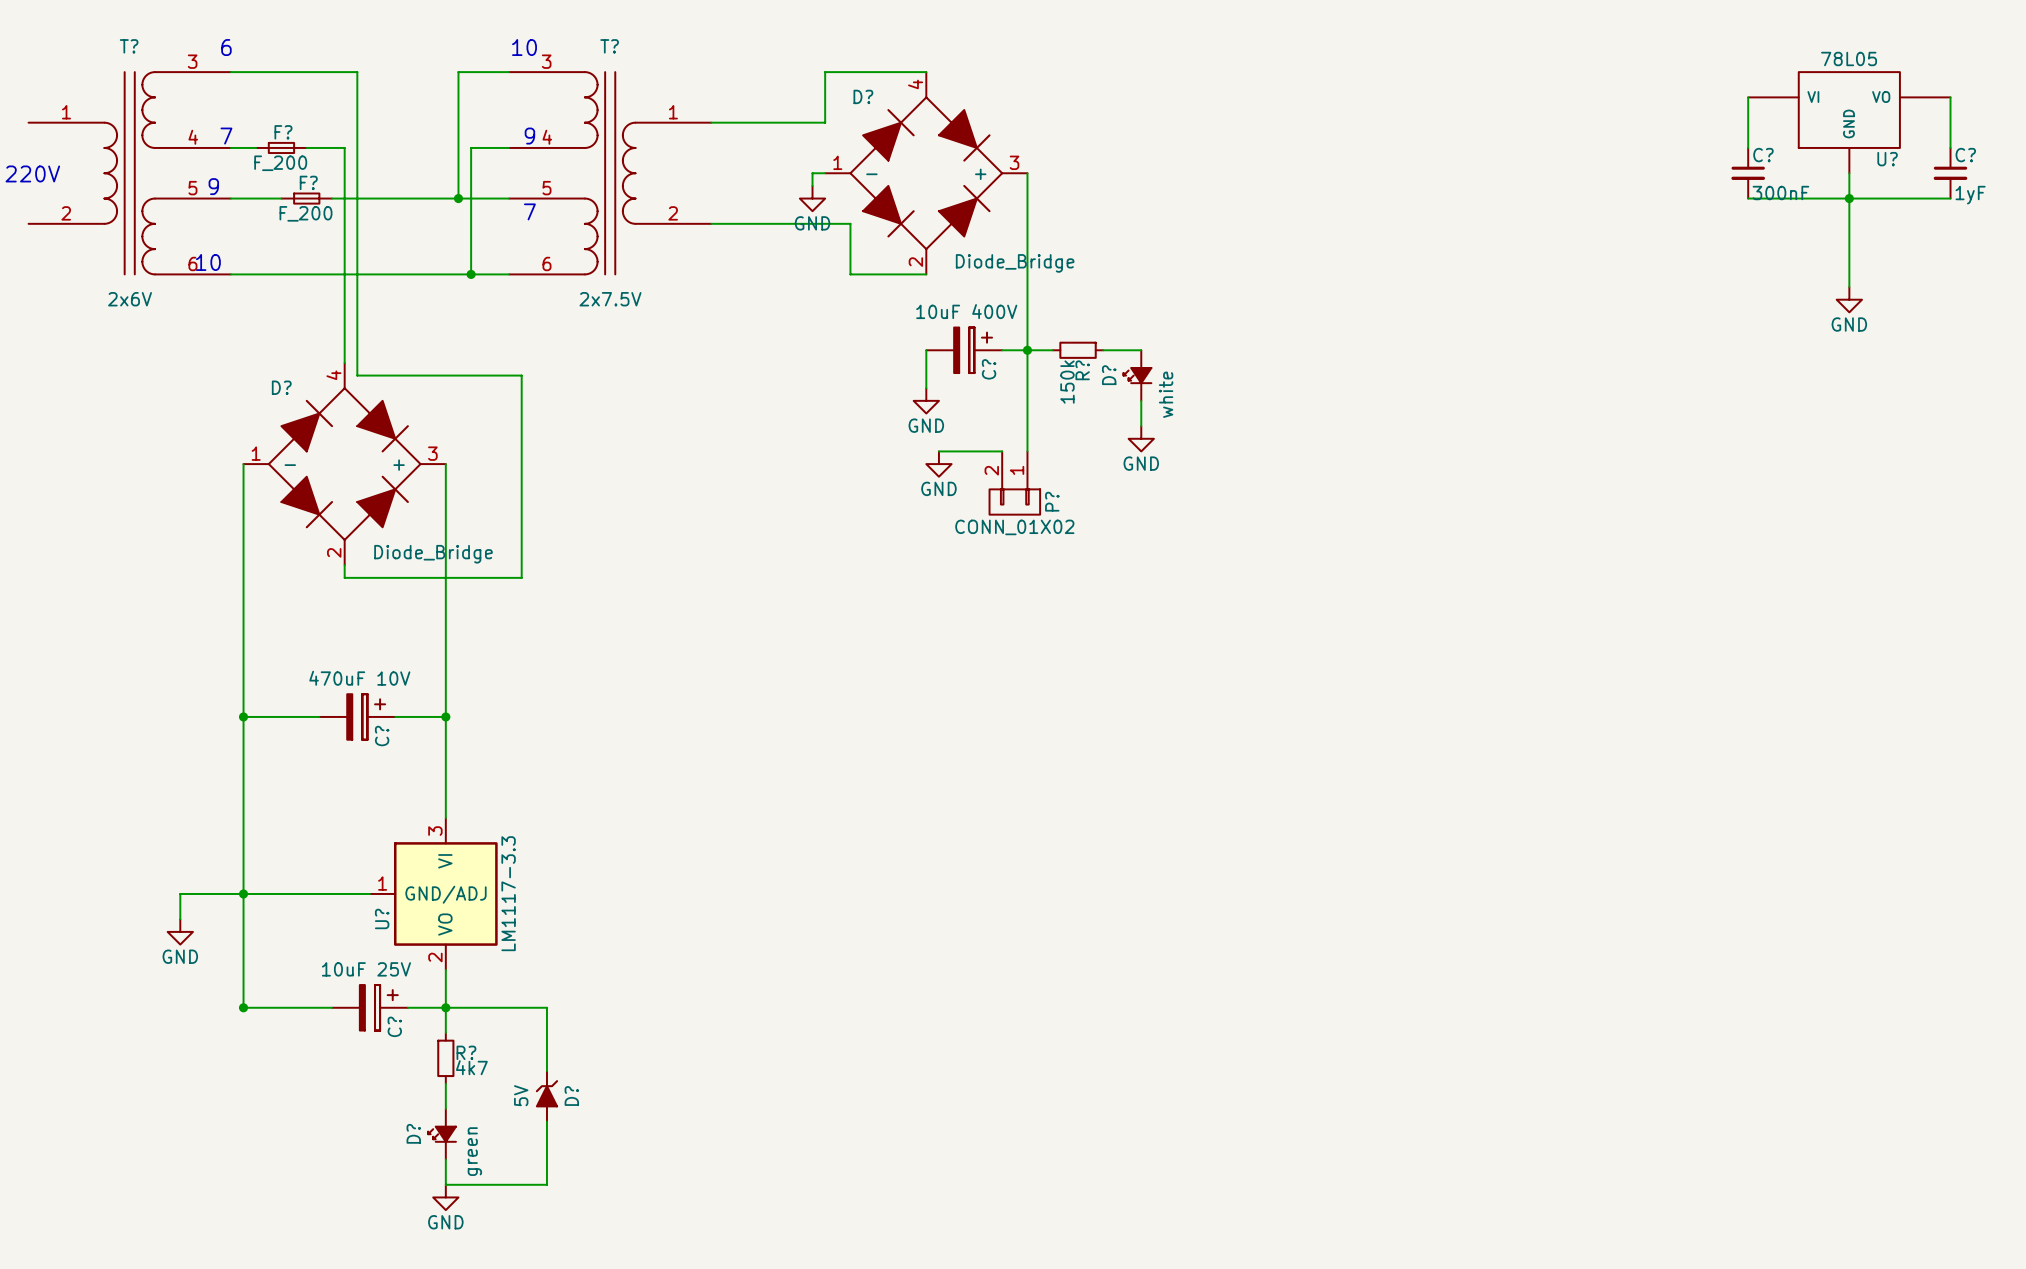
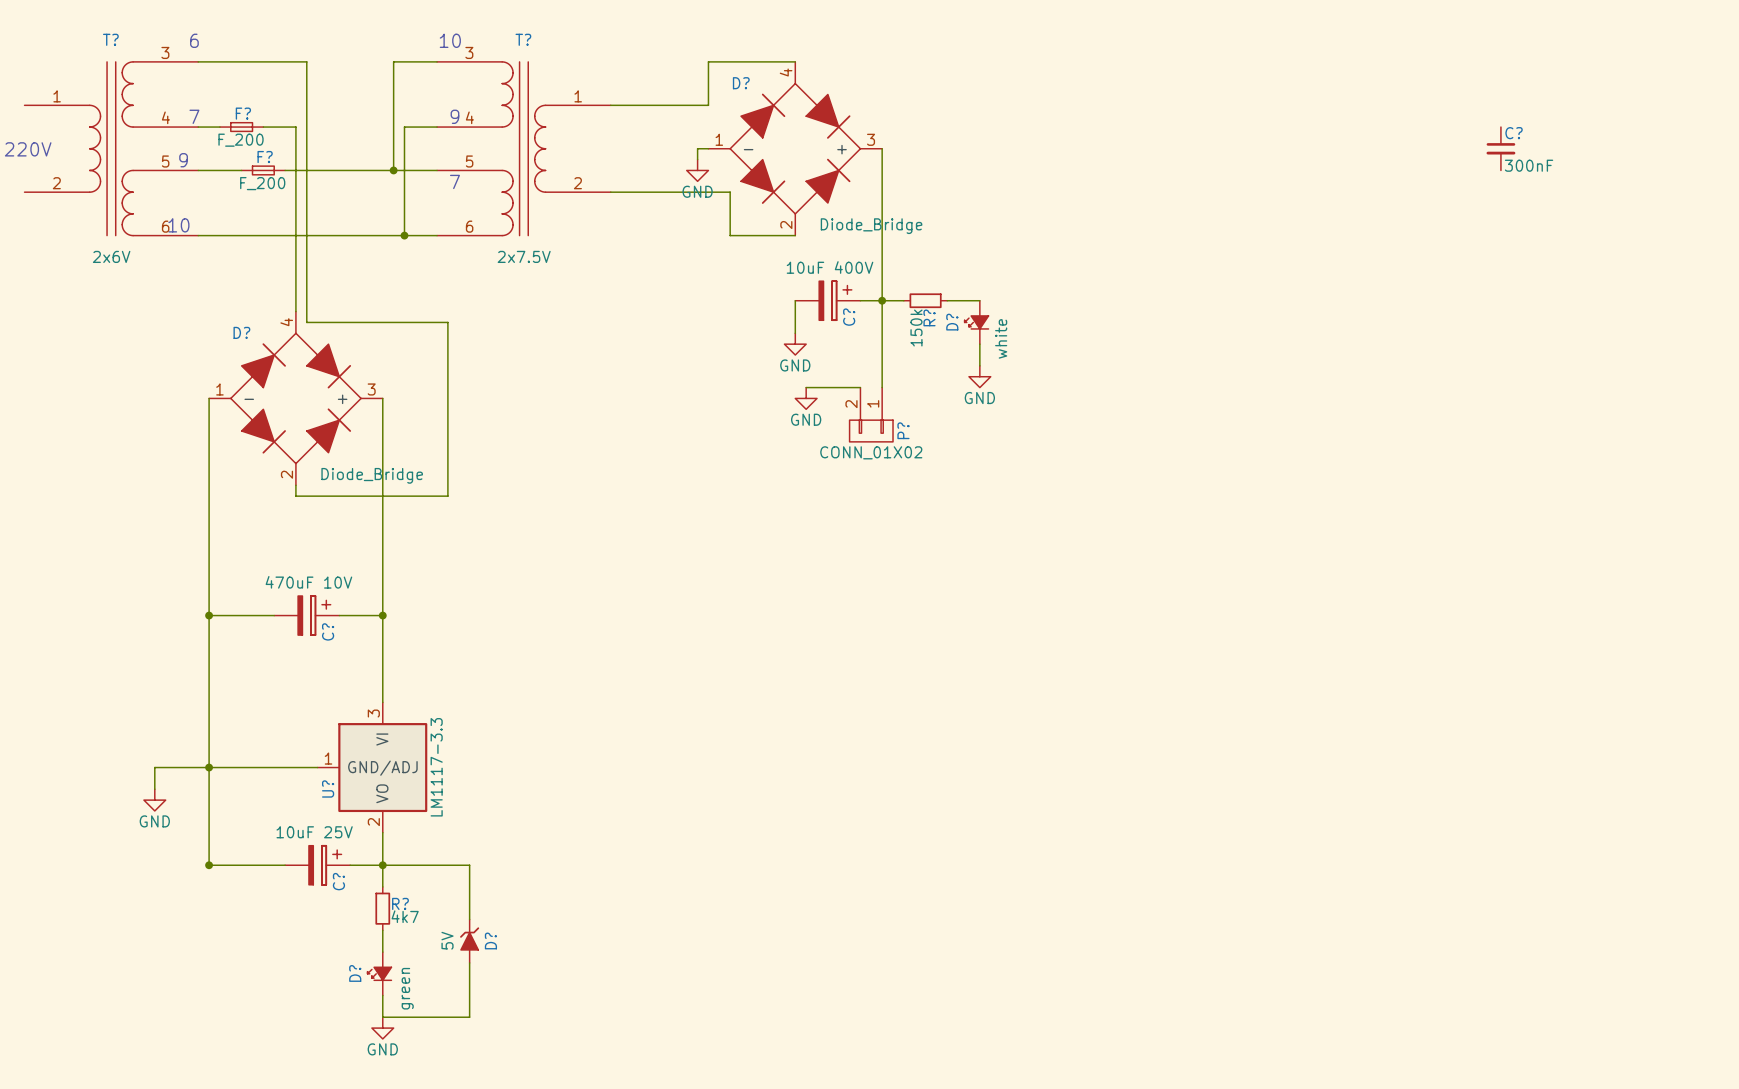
wire: (1748, 97) (1748, 147) -> none
wire: (1950, 97) (1950, 147) -> none
U?: 78L05 (1849, 122) -> none
wire: (1849, 173) (1849, 287) -> none
C?: 1yF (1950, 173) -> none
wire: (1748, 198) (1950, 198) -> none
junction: (1849, 198) -> none
power symbol: GND (1849, 299) -> none

